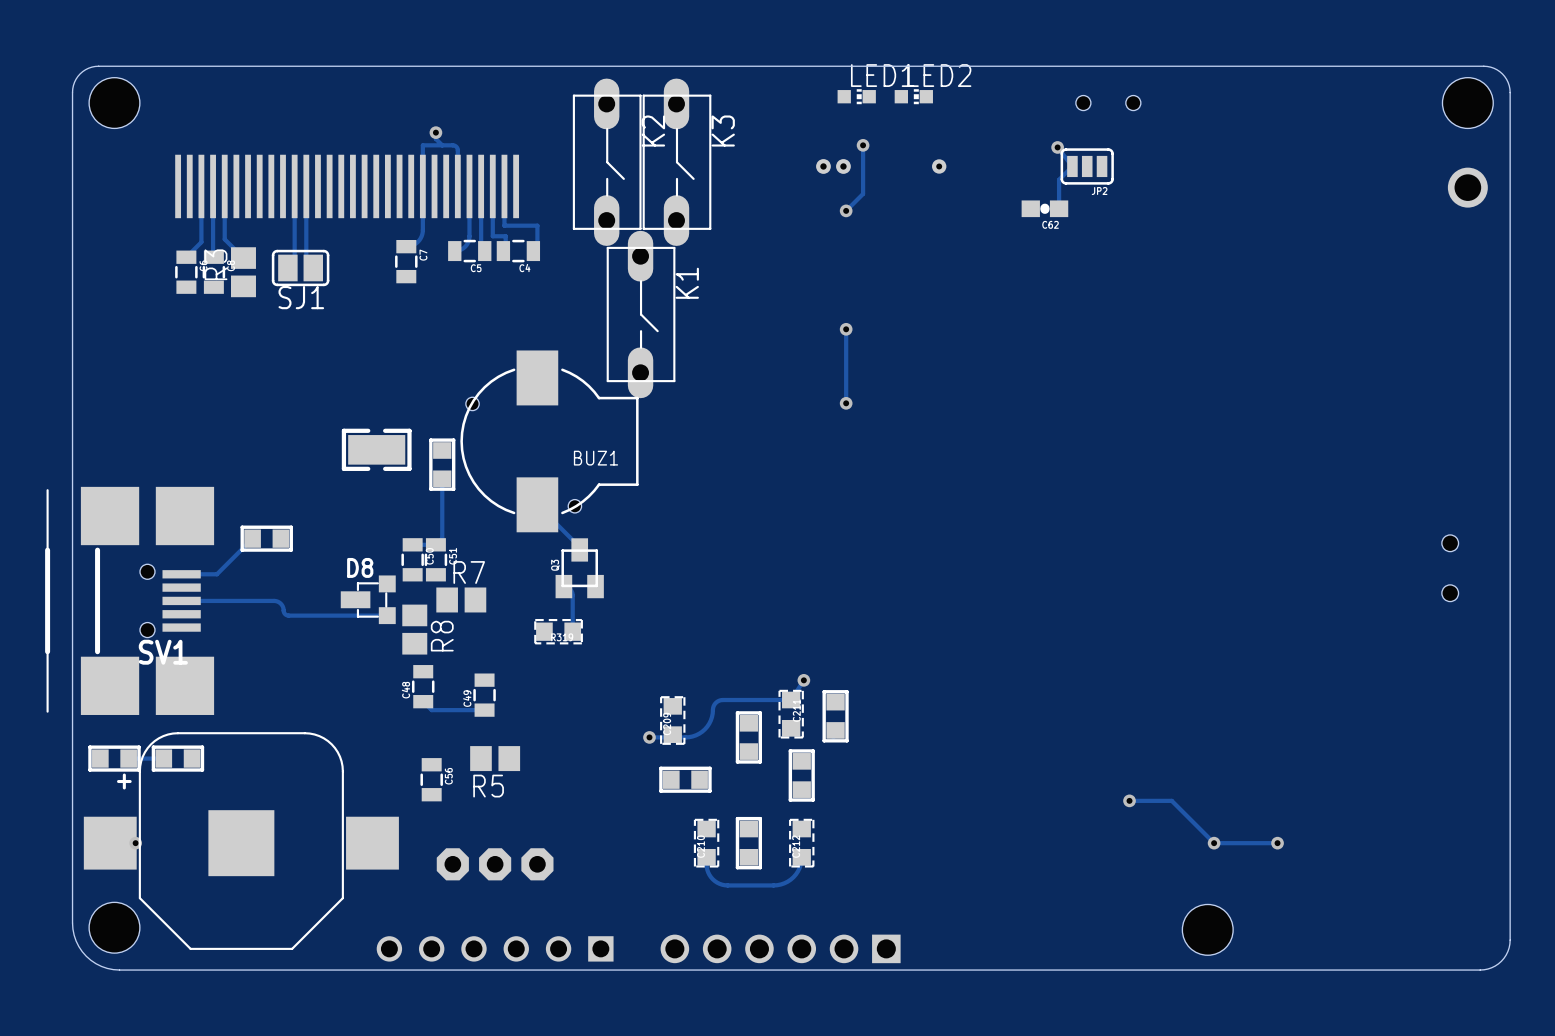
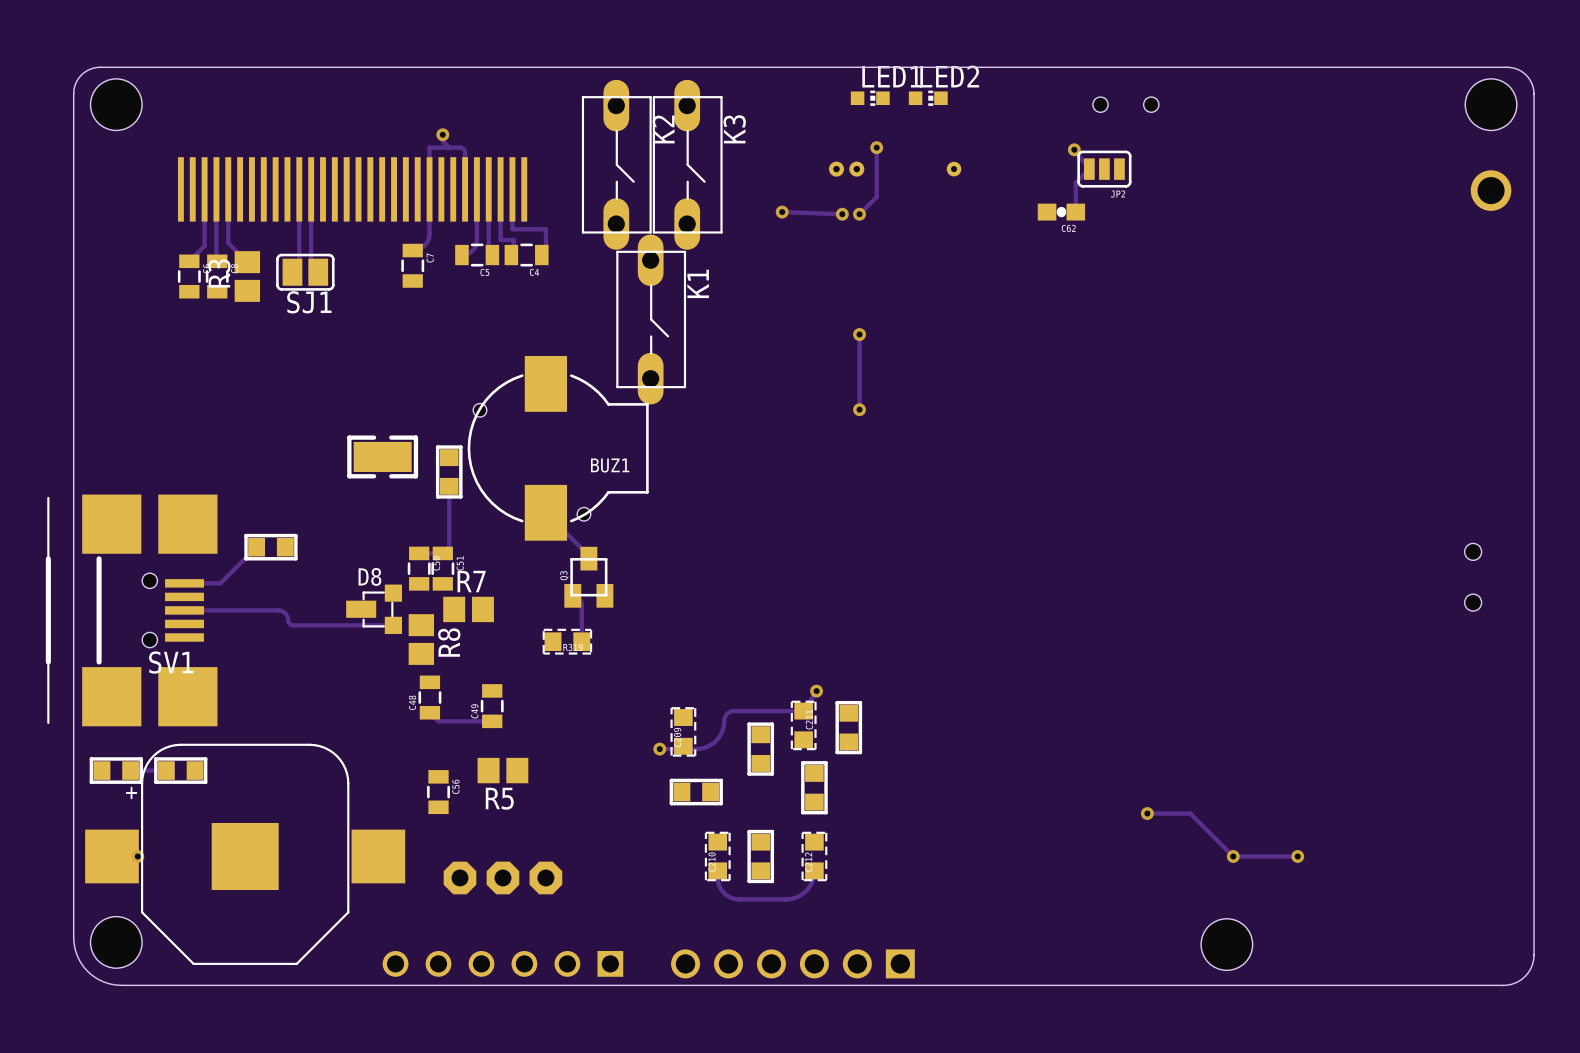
track: none -> (782, 212) (842, 214)
via: none -> (782, 212)
via: none -> (842, 214)

